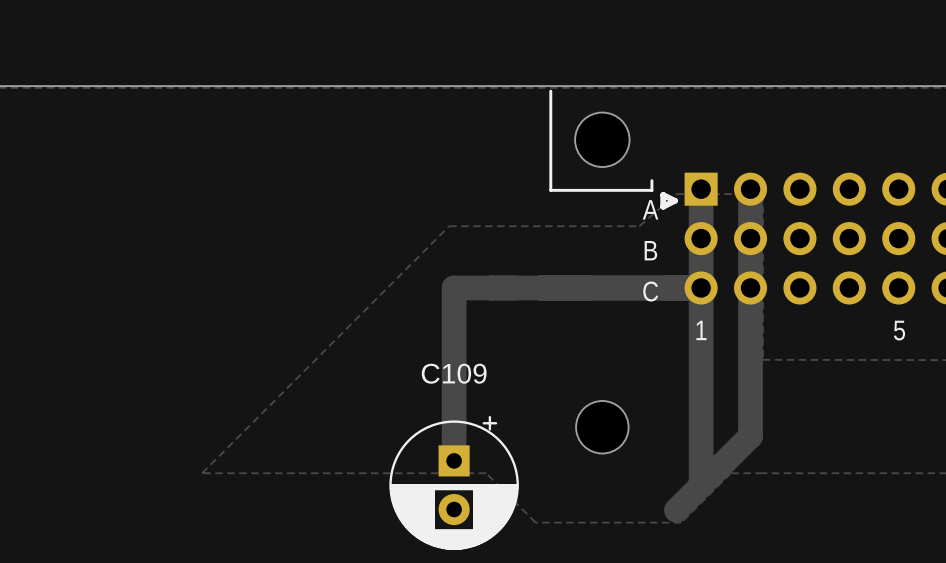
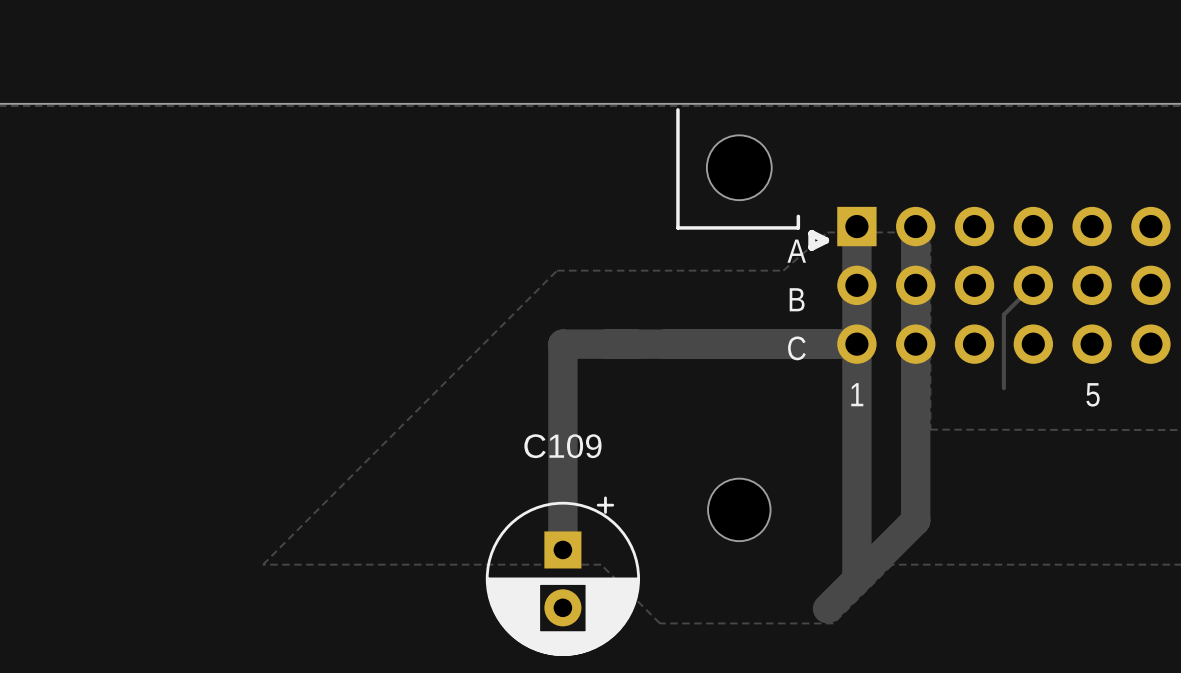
track: none -> (1033, 285) (1003, 314) (1003, 388)

